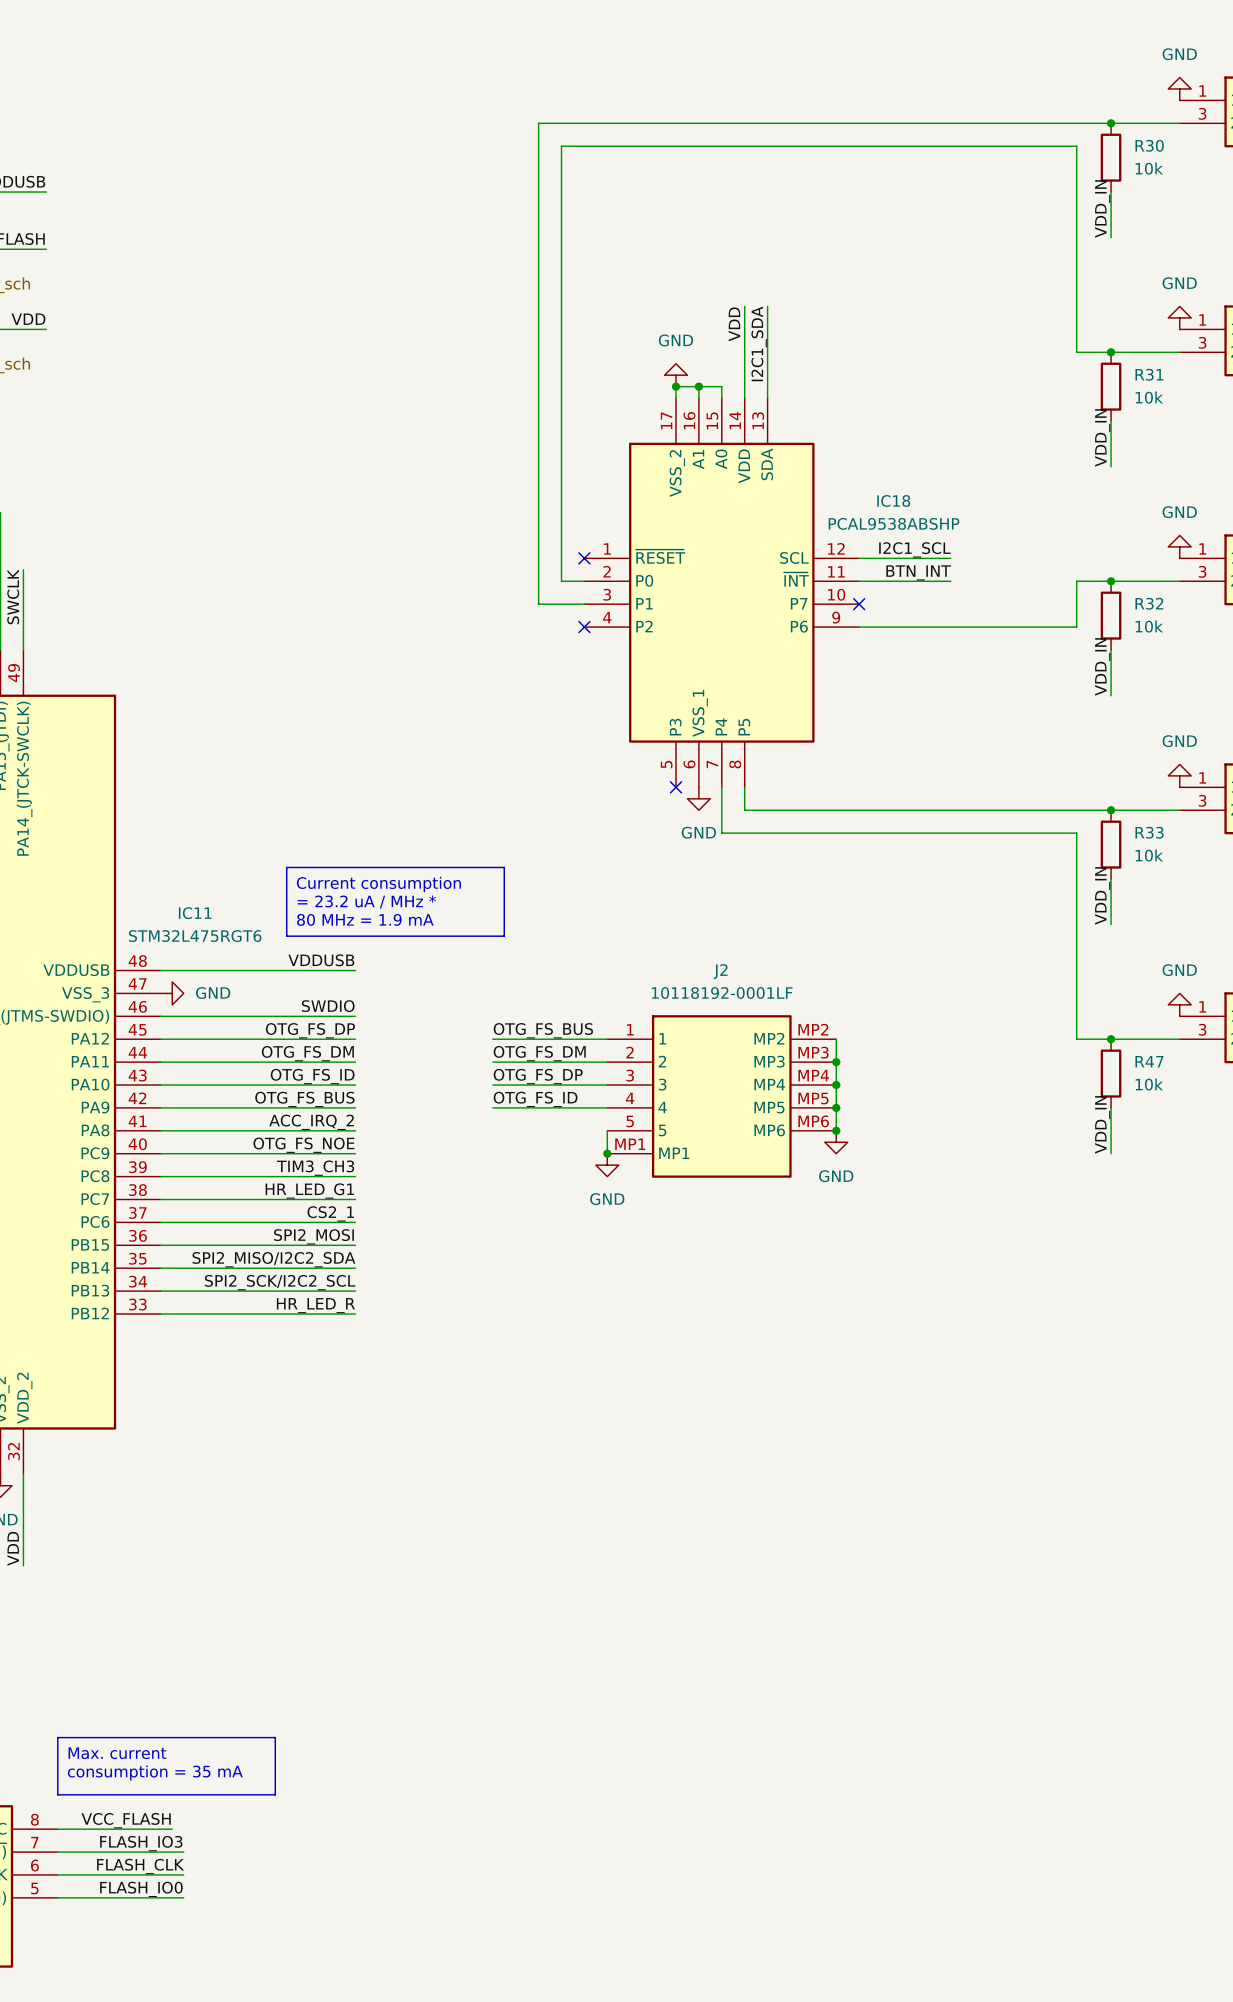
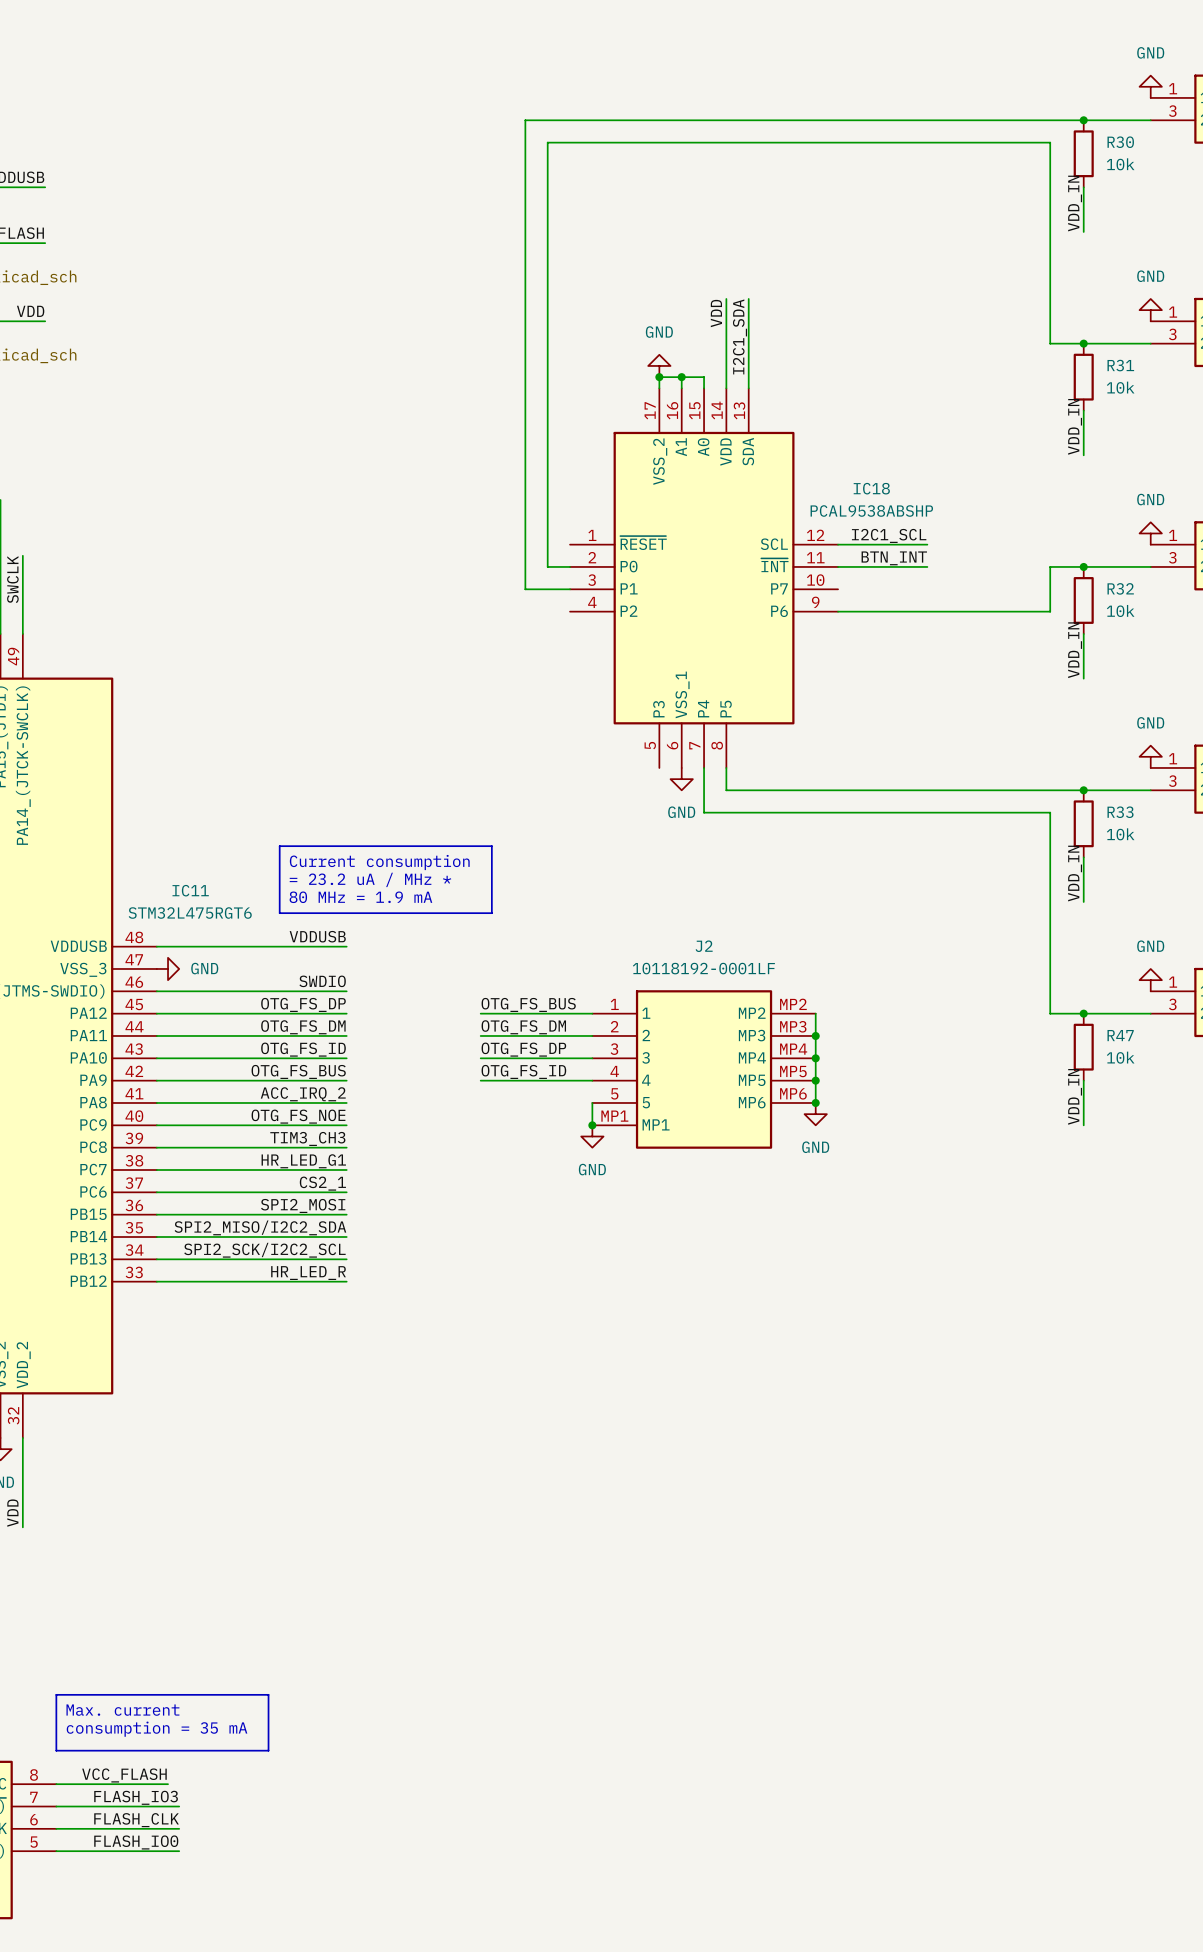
no-connect mark: (584, 558) -> none
no-connect mark: (859, 604) -> none
no-connect mark: (584, 627) -> none
no-connect mark: (676, 787) -> none

